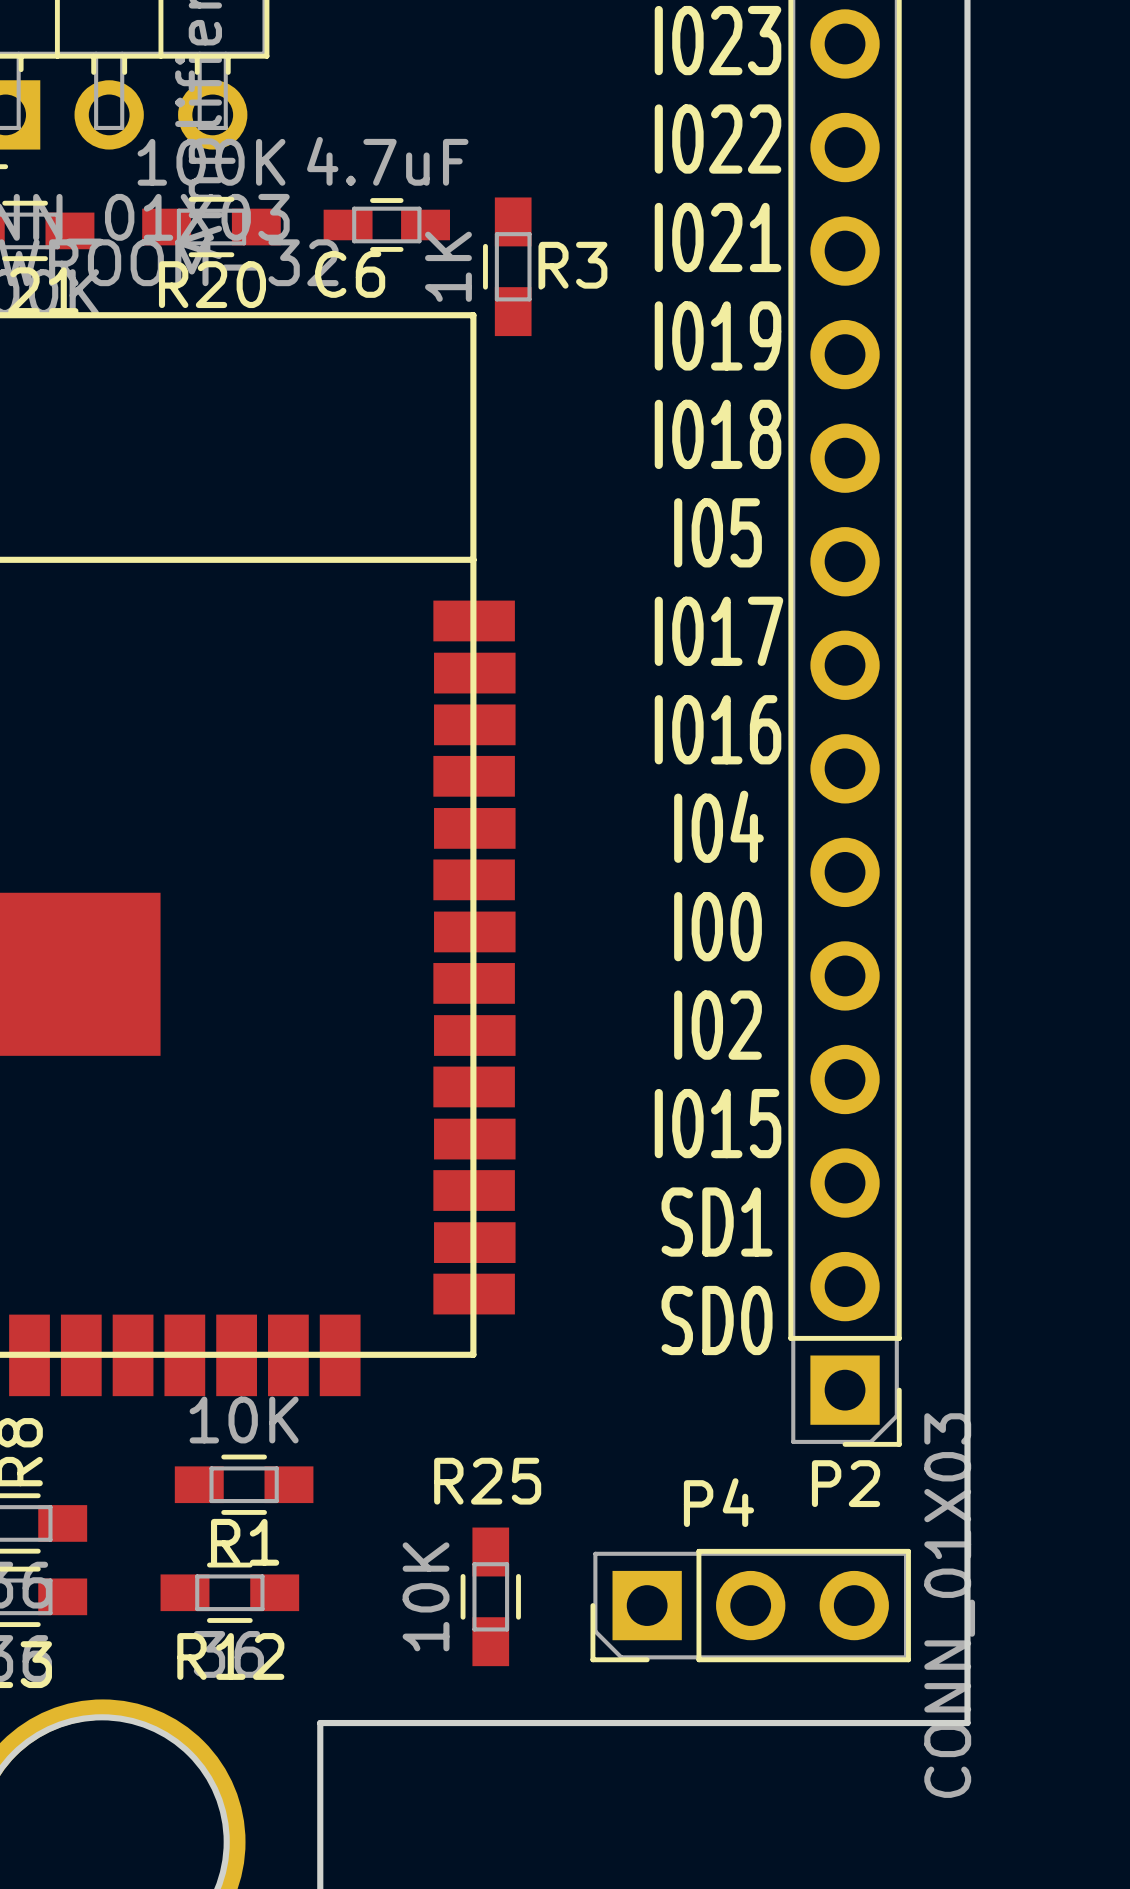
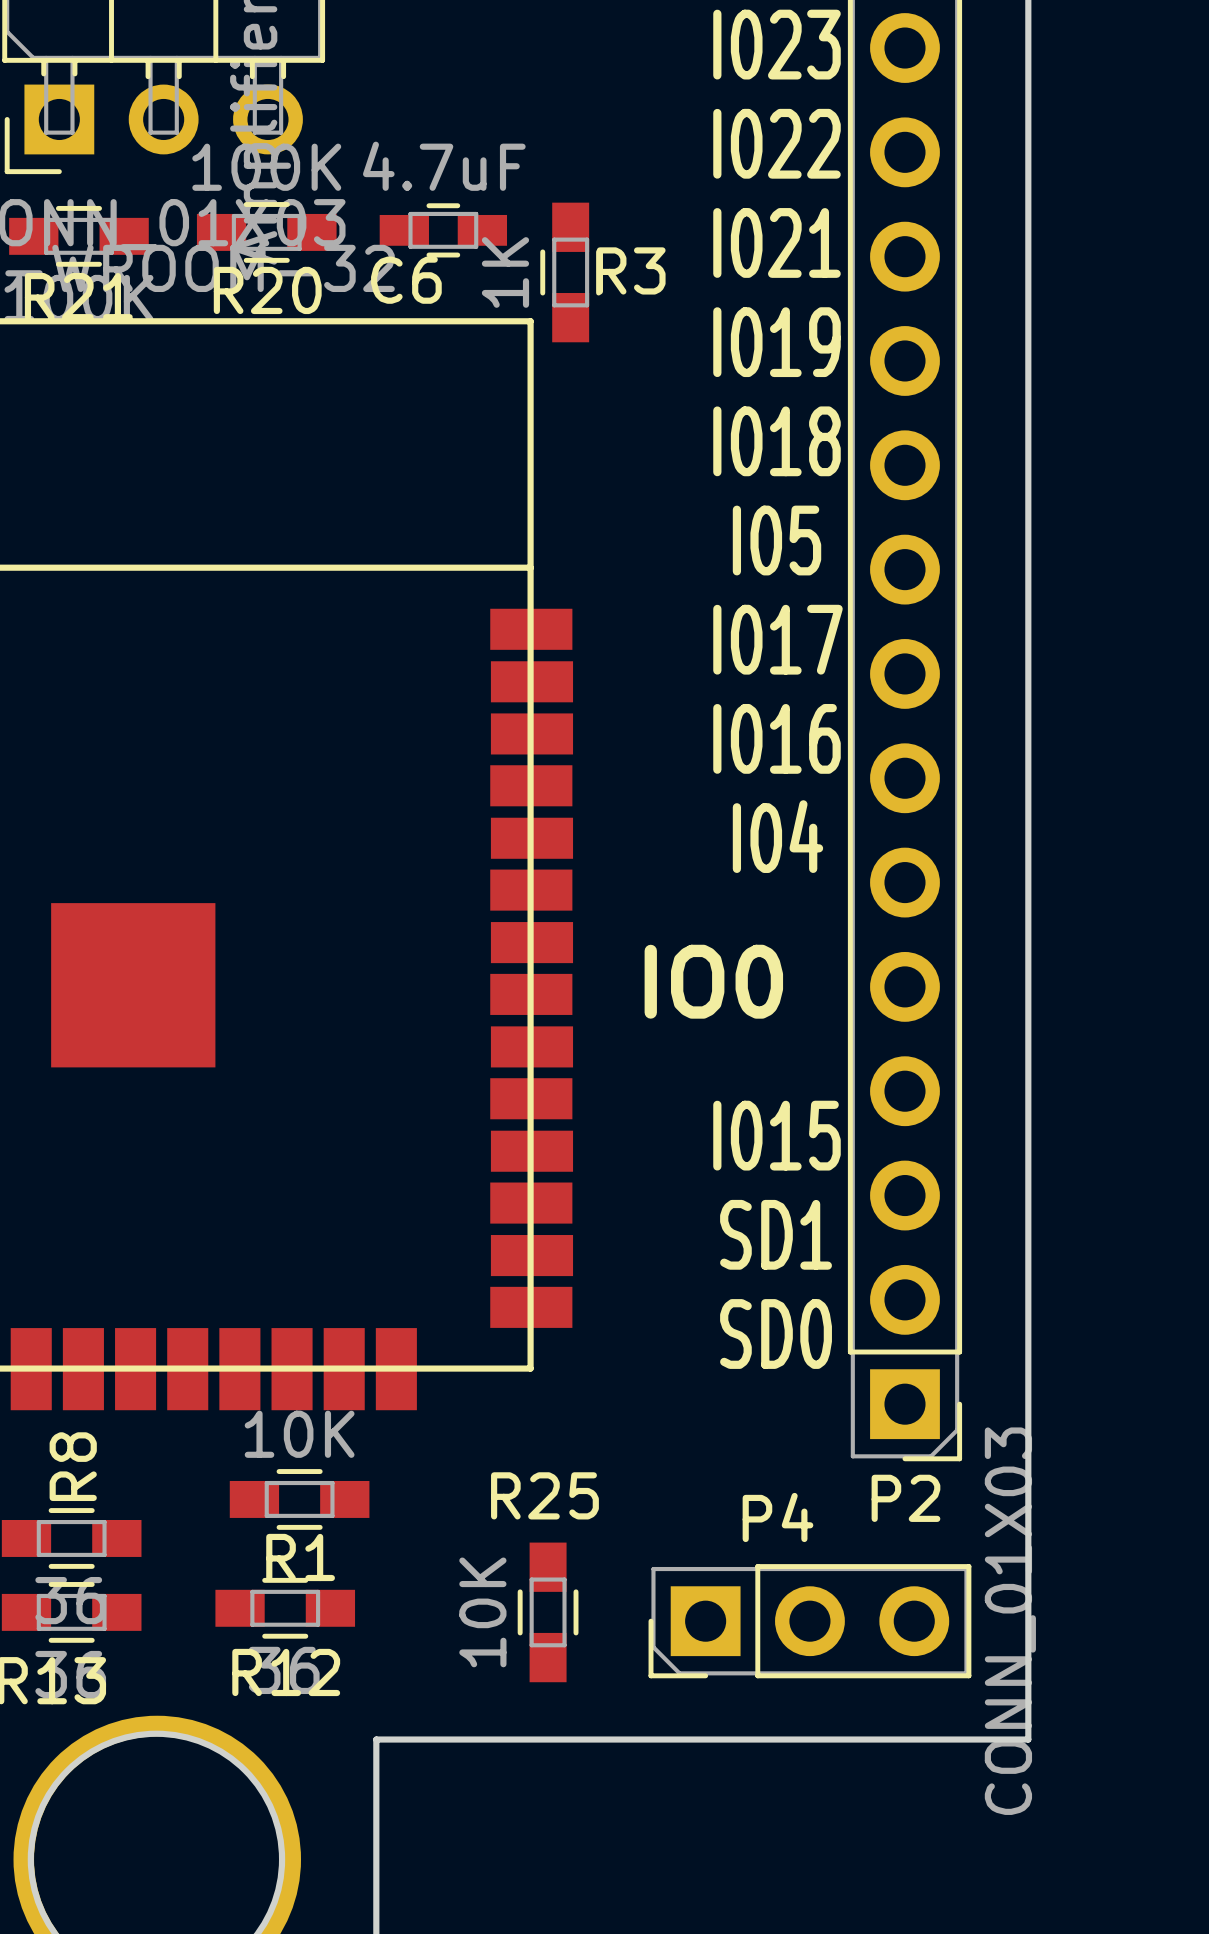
text: I00 (718, 926) -> none
text: none -> IO0 (713, 981)
text: I02 (718, 1025) -> none

